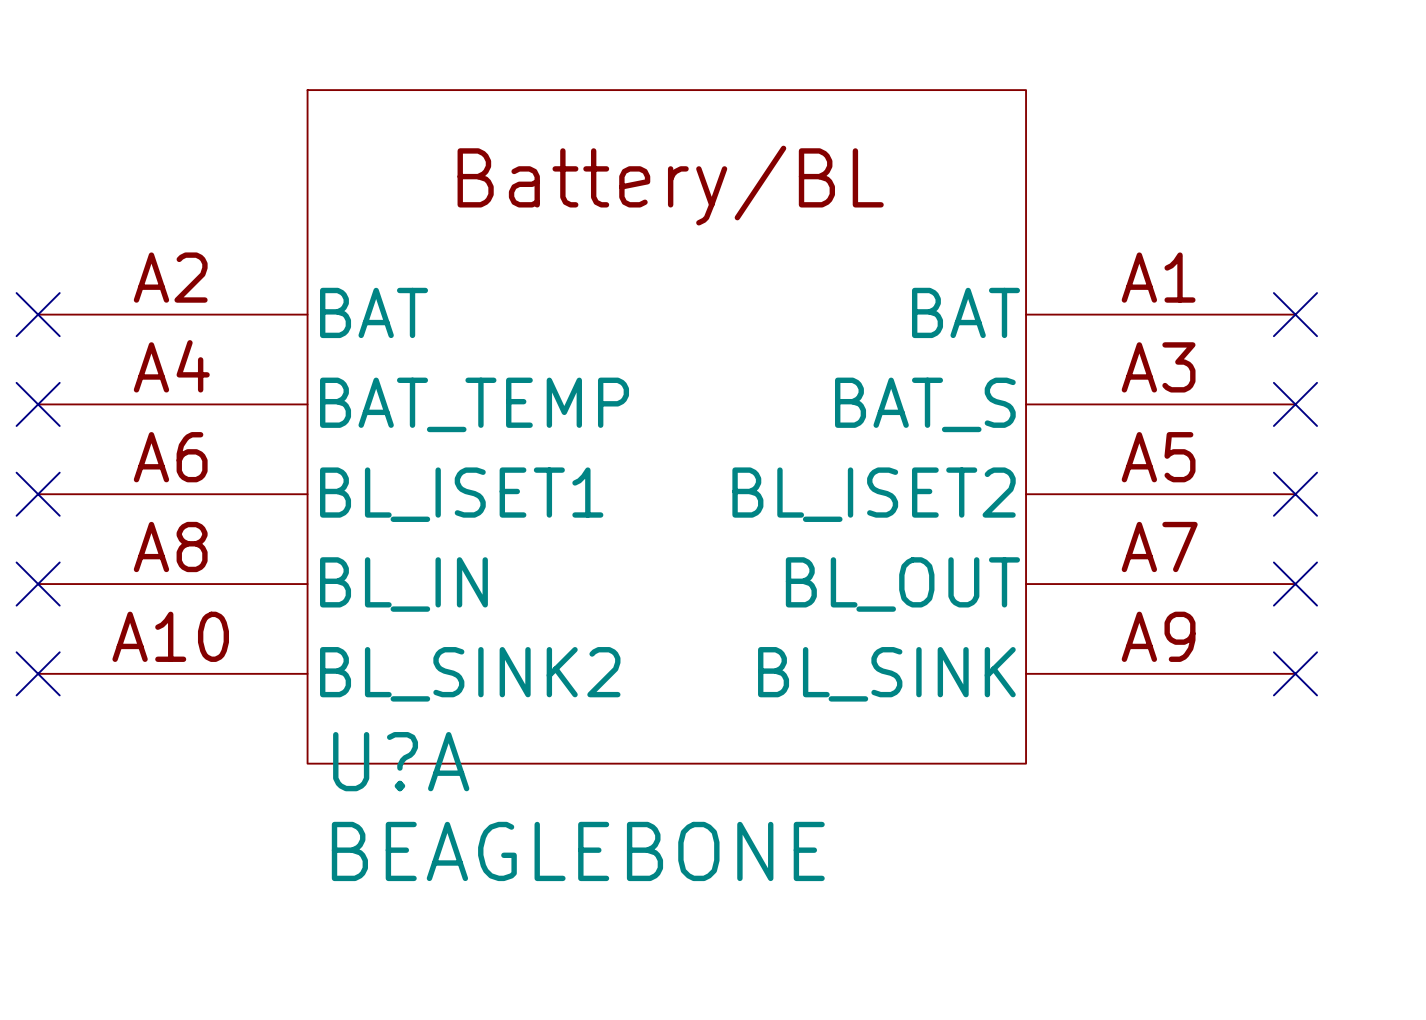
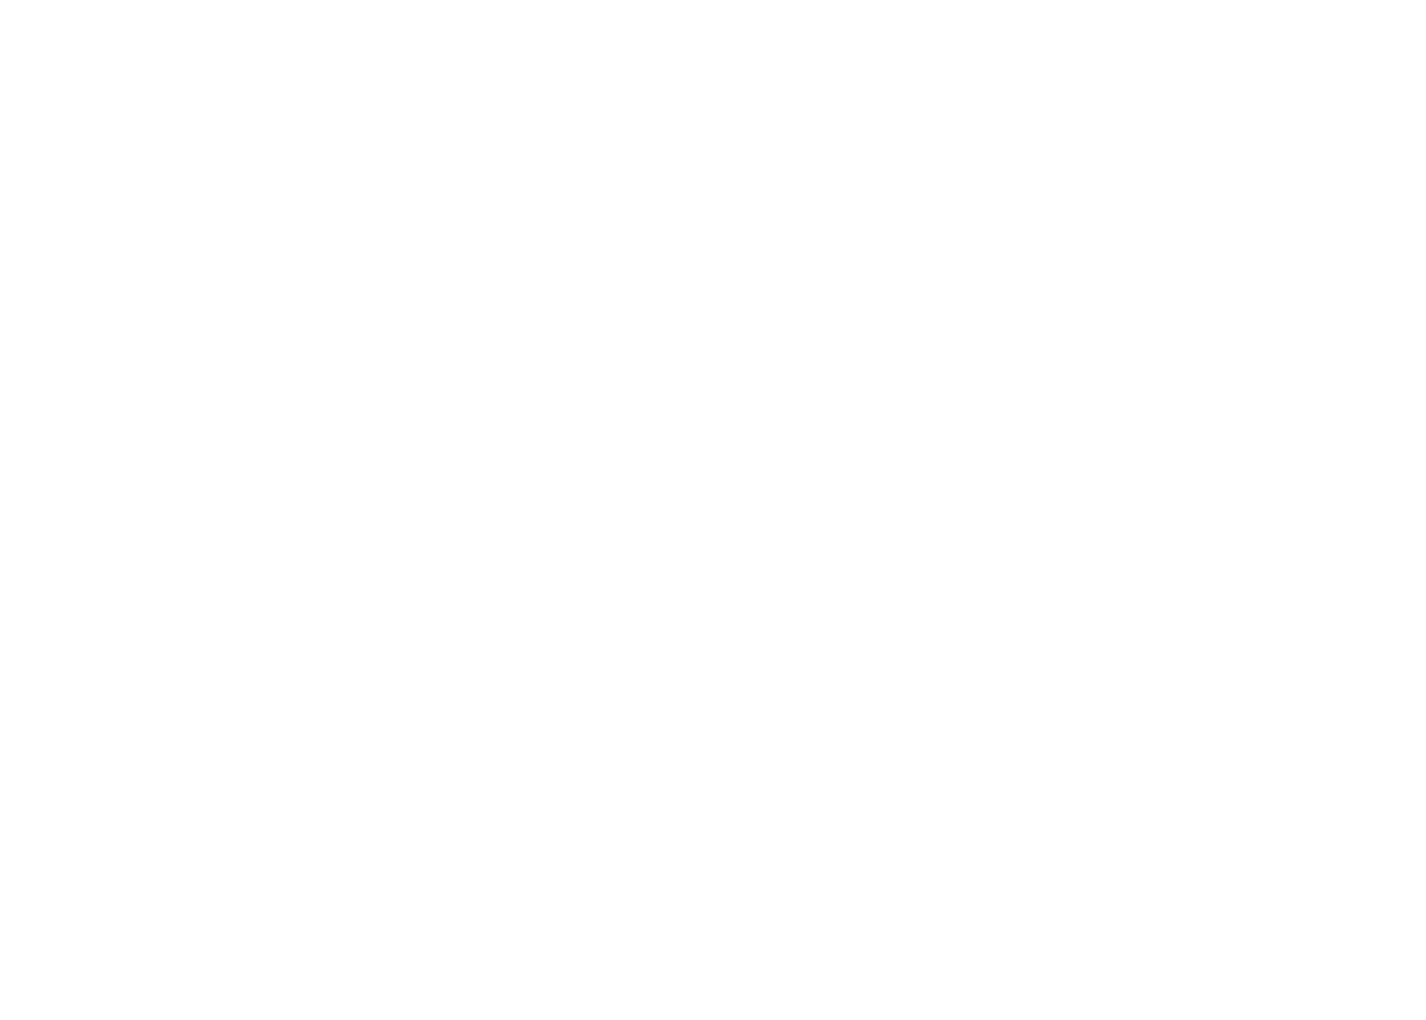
no-connect mark: (38, 314) -> none
no-connect mark: (1295, 314) -> none
no-connect mark: (38, 404) -> none
no-connect mark: (1295, 404) -> none
U?A: BEAGLEBONE (666, 426) -> none
no-connect mark: (38, 494) -> none
no-connect mark: (1295, 494) -> none
no-connect mark: (38, 584) -> none
no-connect mark: (1295, 584) -> none
no-connect mark: (38, 673) -> none
no-connect mark: (1295, 673) -> none

